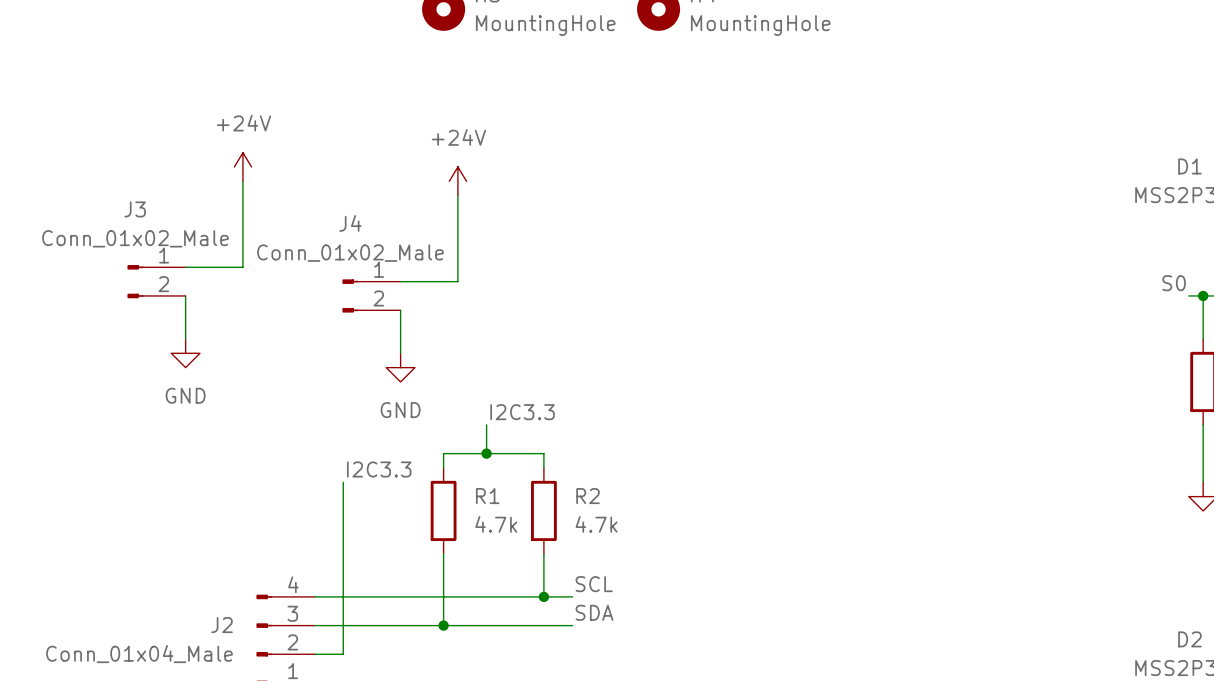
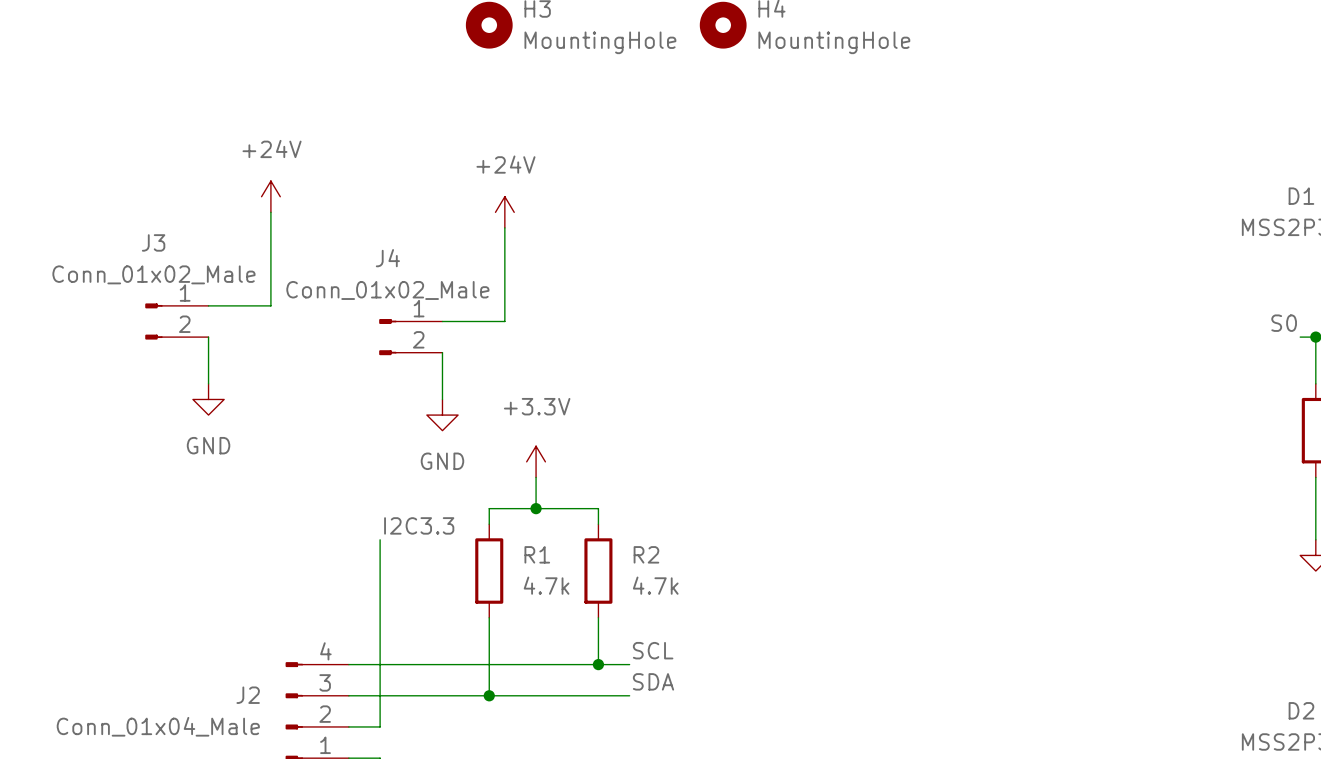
power symbol: none -> +3.3V (536, 461)
label: I2C3.3 (522, 412) -> none

